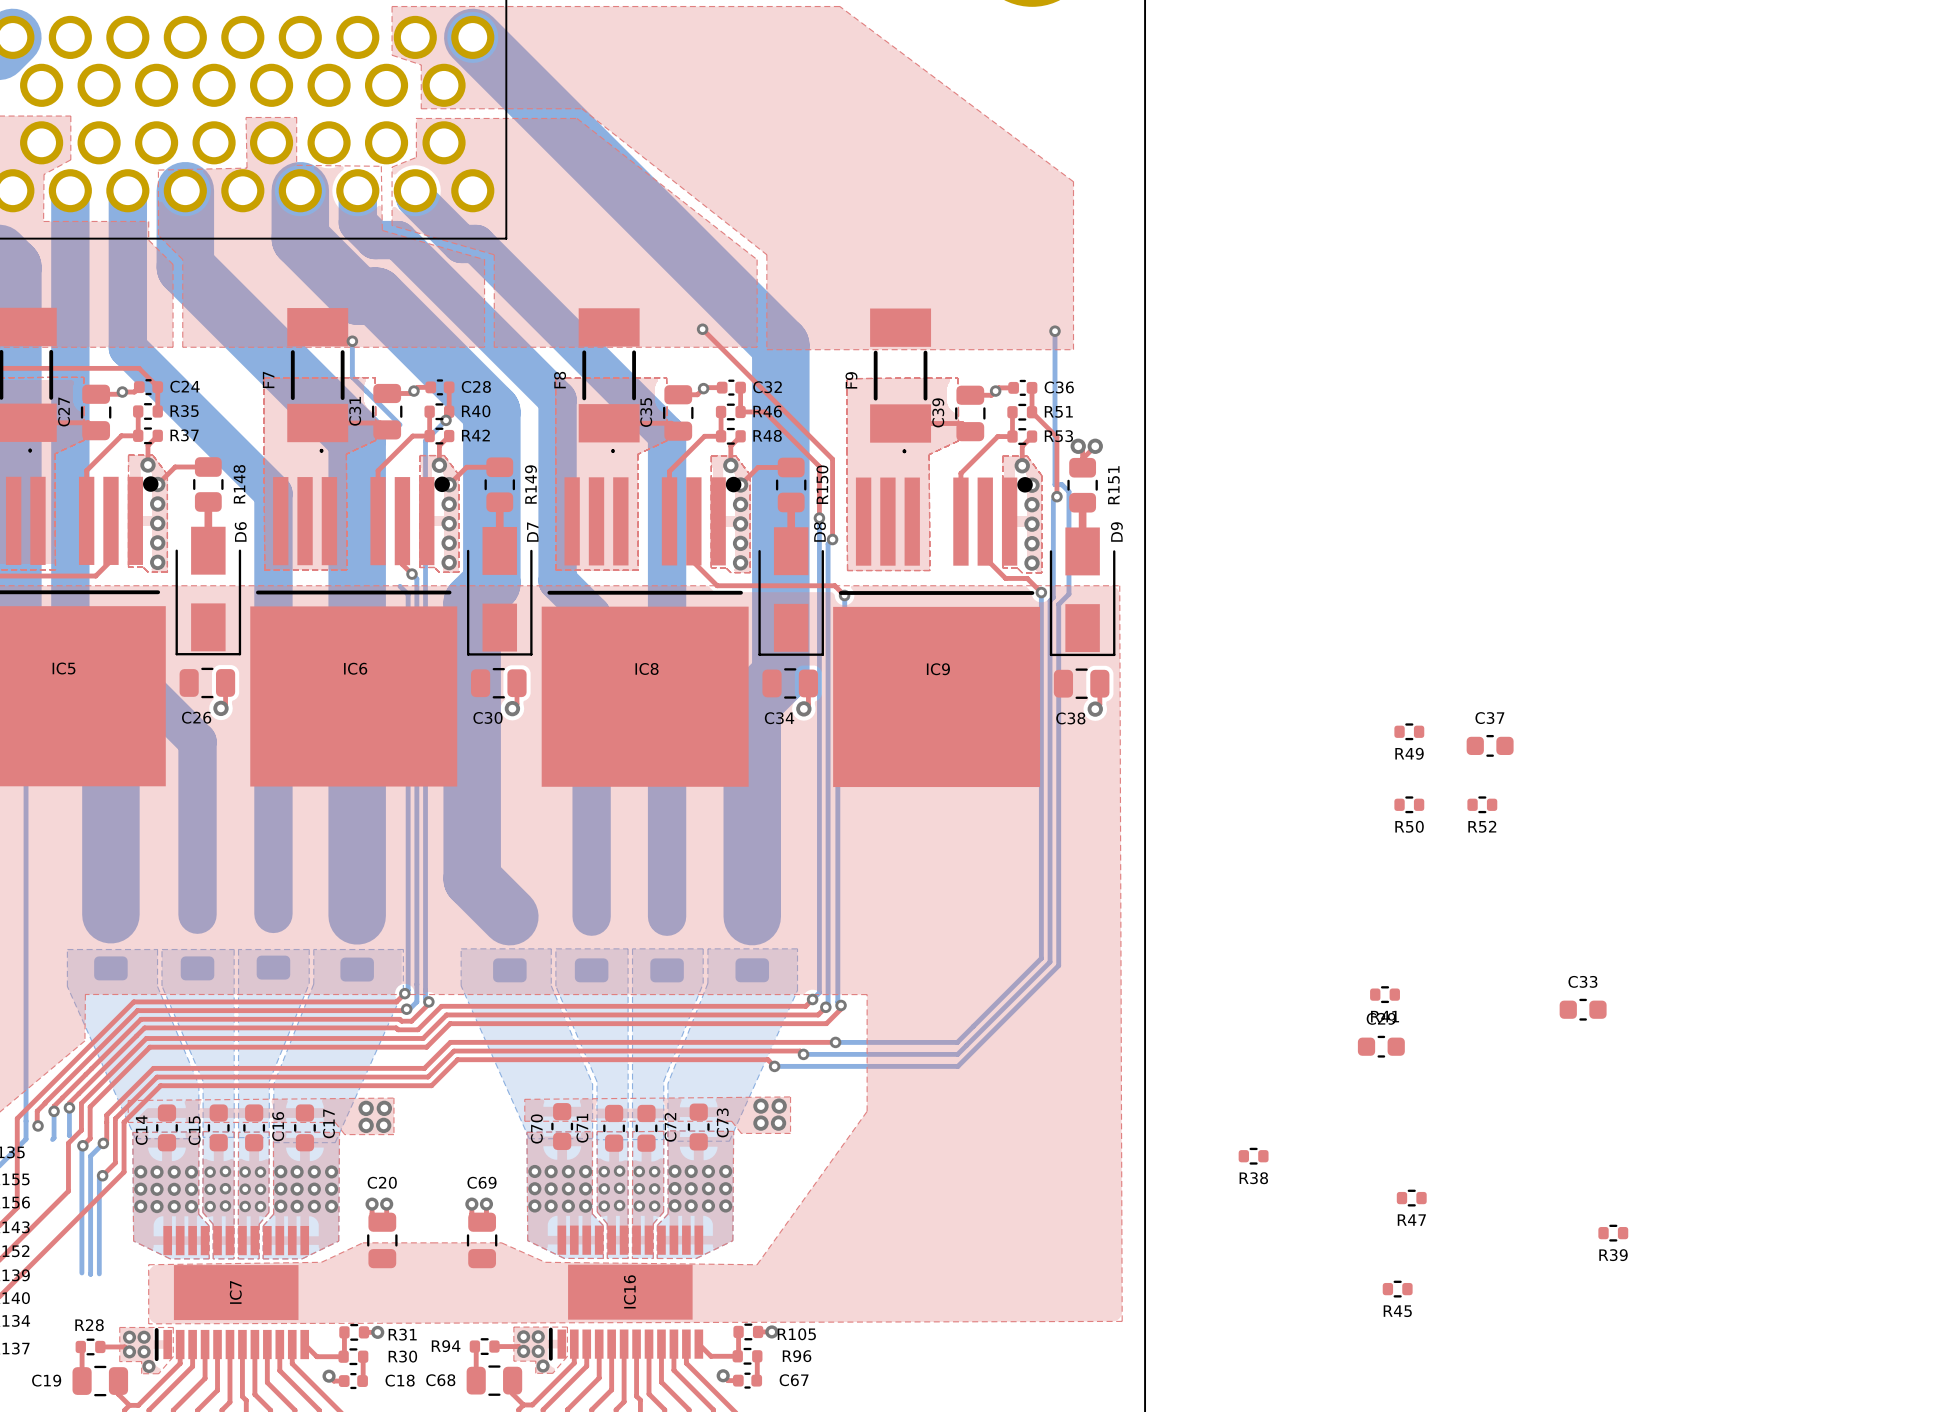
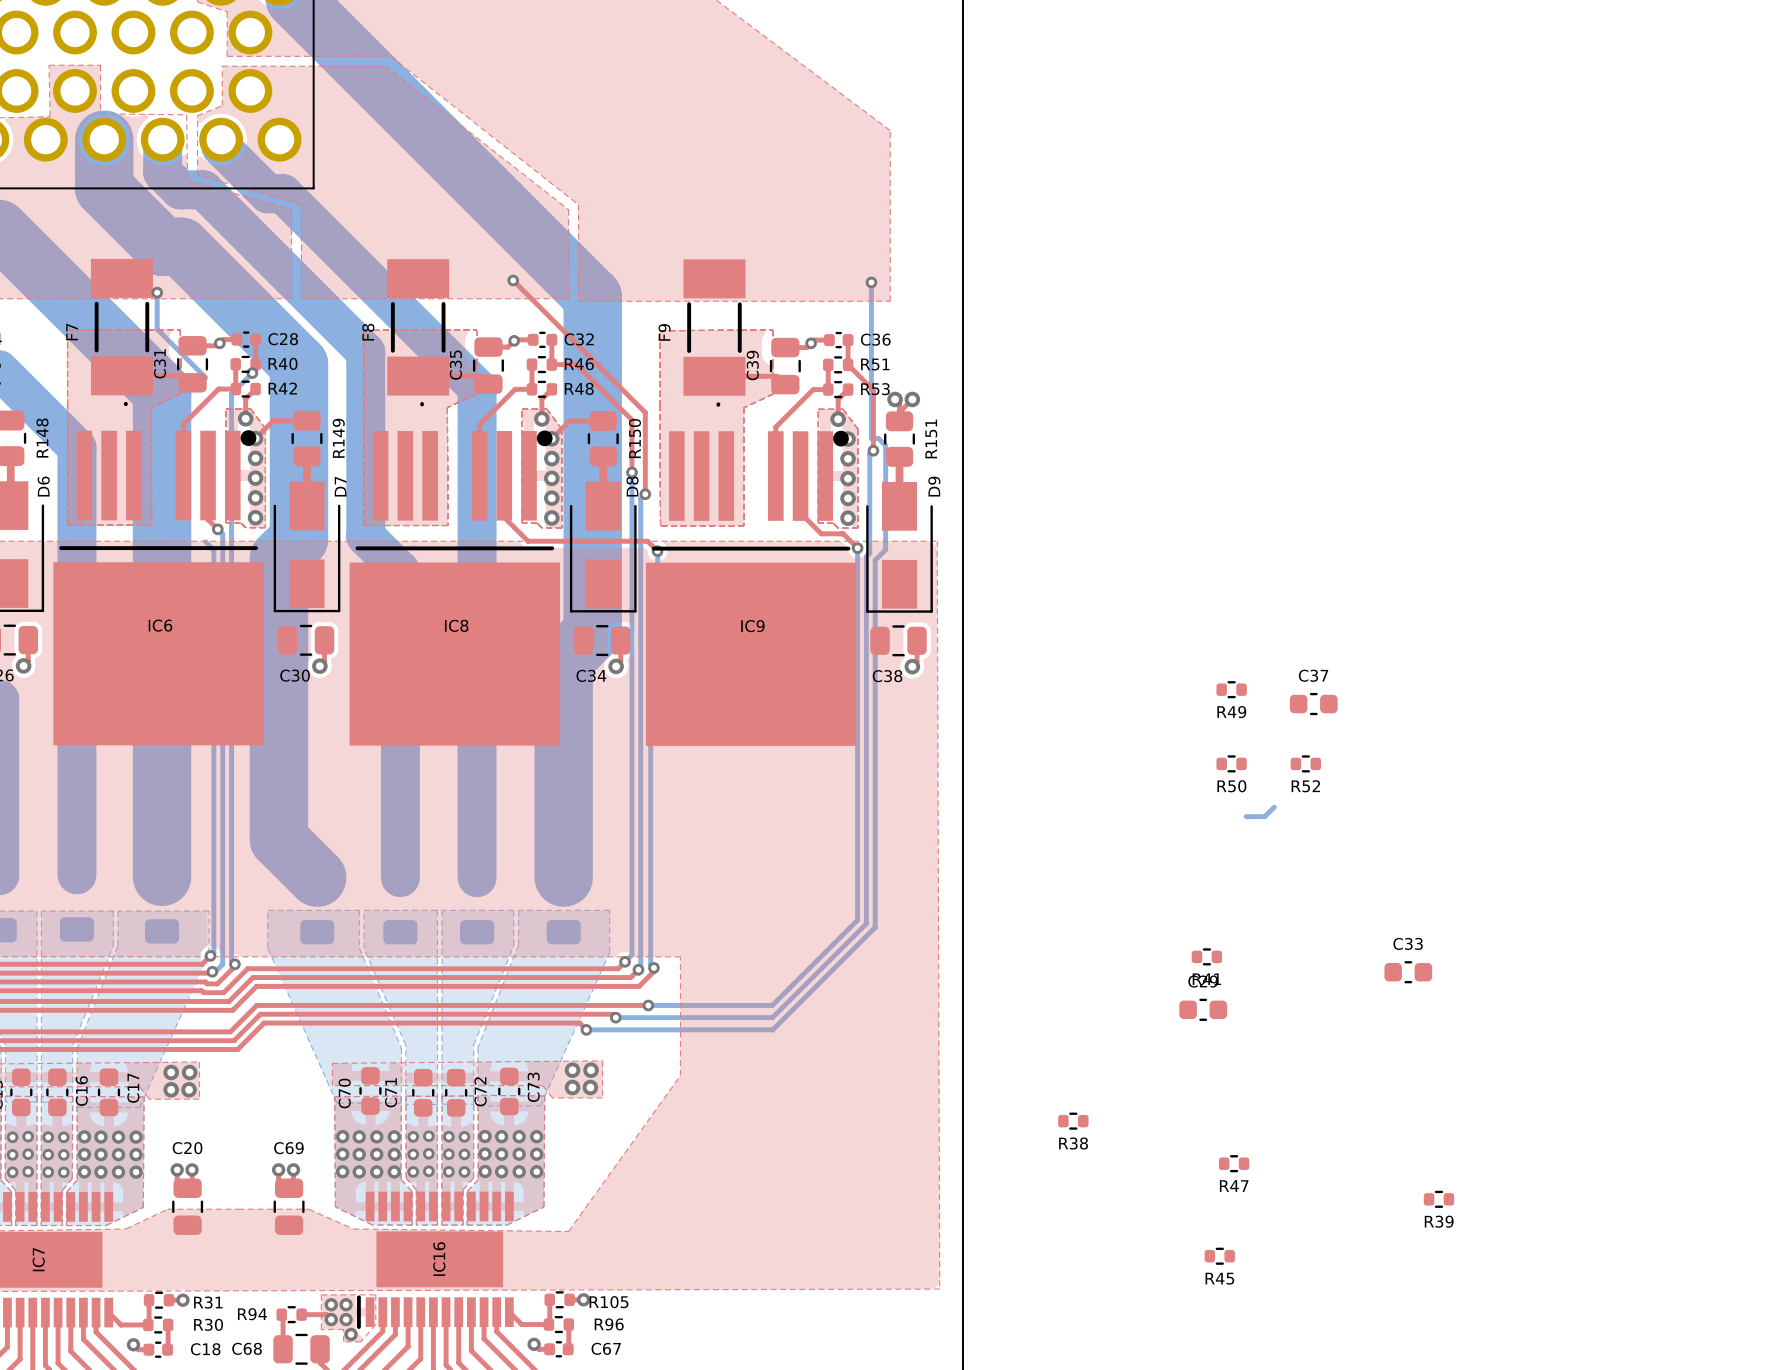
bottom track: none -> (1274, 807) (1264, 816) (1246, 816)

